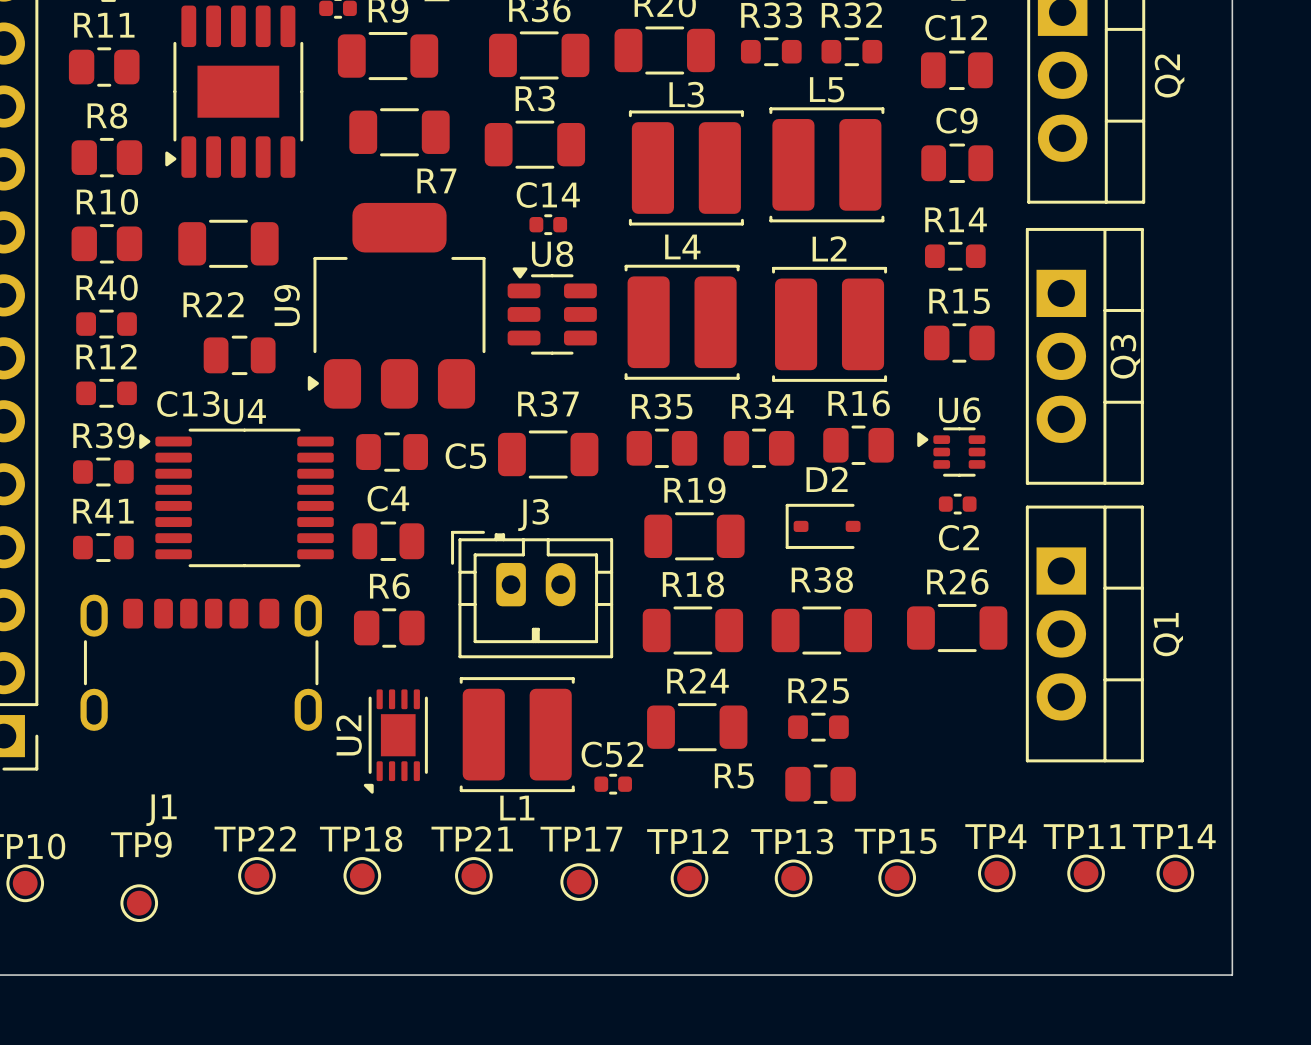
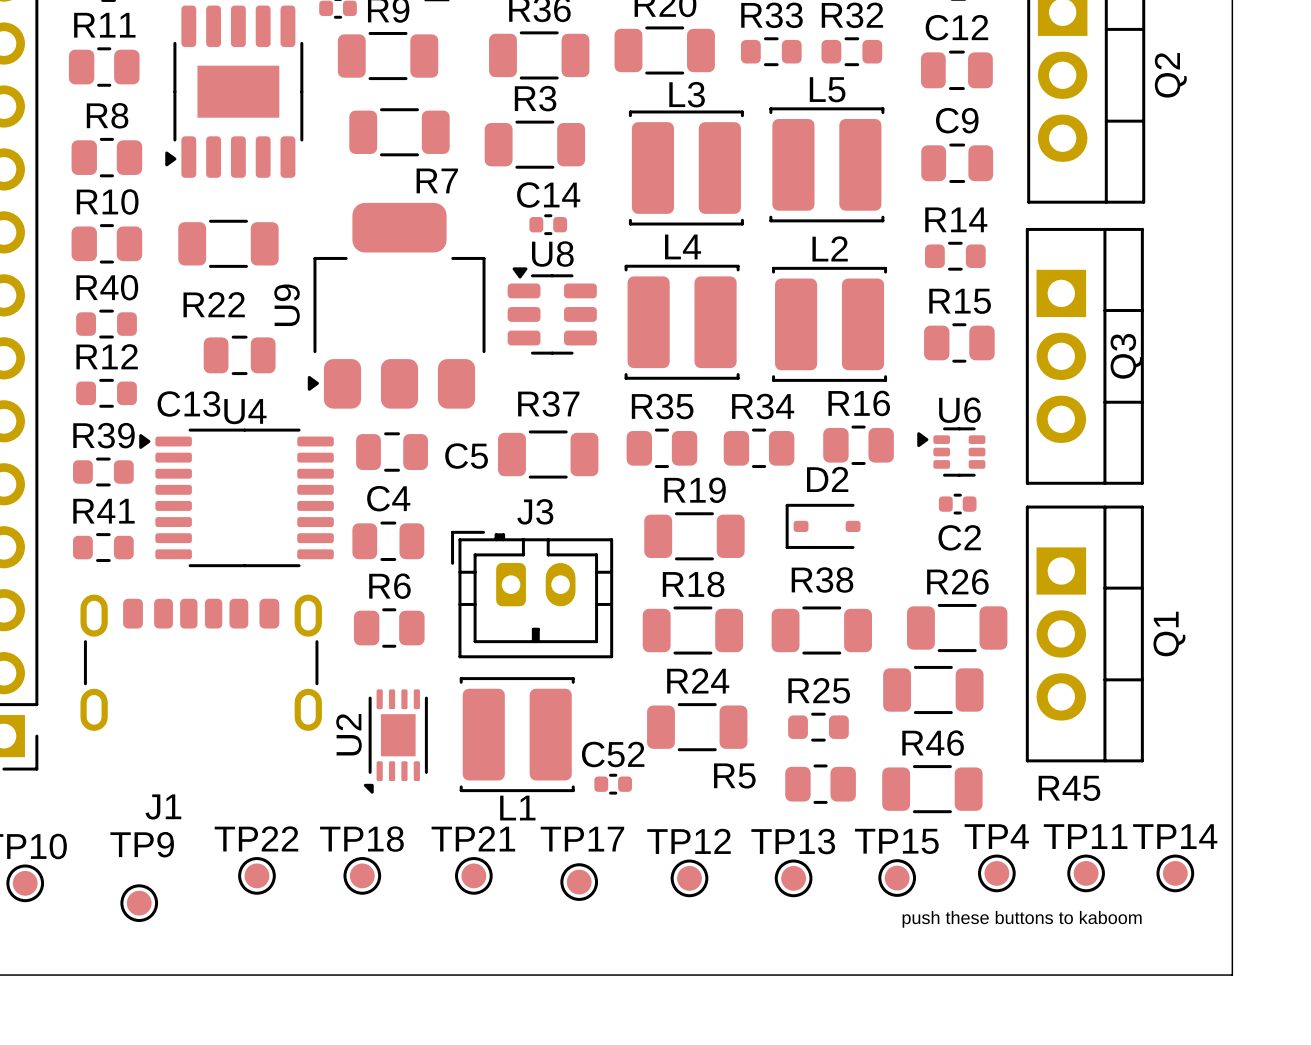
R45: none -> (933, 689)
R46: none -> (932, 789)
text: none -> push these buttons to kaboom (1022, 919)

